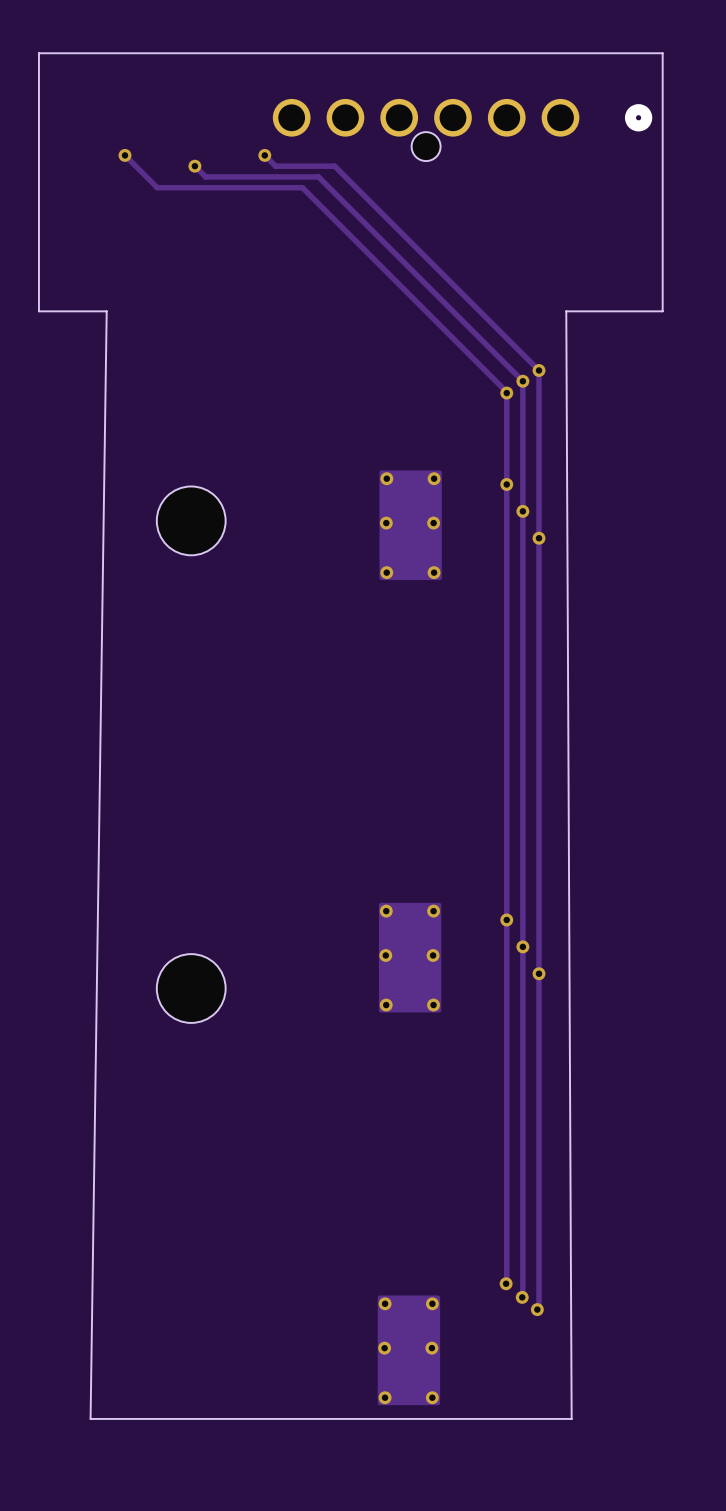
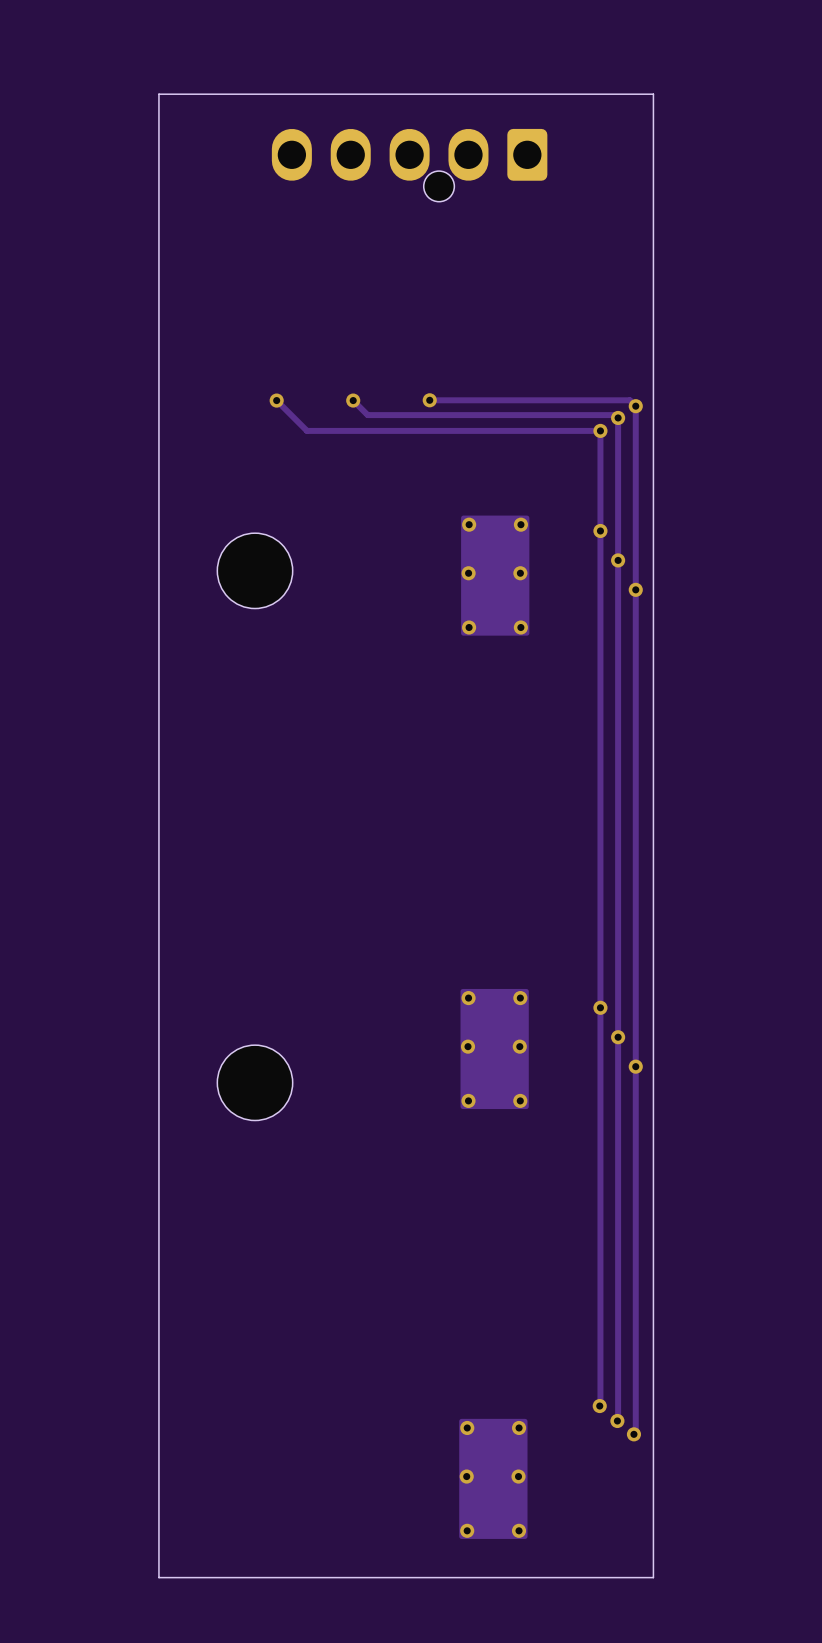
board edge: (662, 53) (38, 53) (38, 311) (106, 311) (90, 1418) (571, 1418) (566, 311) (662, 311) (662, 53) -> (653, 94) (653, 1577) (158, 1577) (158, 94) (653, 94)
part: (462, 130) -> none
part: none -> (409, 165)
track: (125, 155) (157, 187) (302, 187) (506, 391) -> none
via: (125, 155) -> none
track: (264, 155) (275, 166) (334, 166) (533, 365) -> (429, 400) (629, 400)
via: (264, 155) -> none
track: (194, 166) (205, 176) (318, 176) (520, 378) -> (353, 400) (367, 415) (615, 415)
via: (194, 166) -> none
track: none -> (276, 400) (307, 430) (600, 430)
via: none -> (276, 400)
via: none -> (353, 400)
via: none -> (429, 400)

